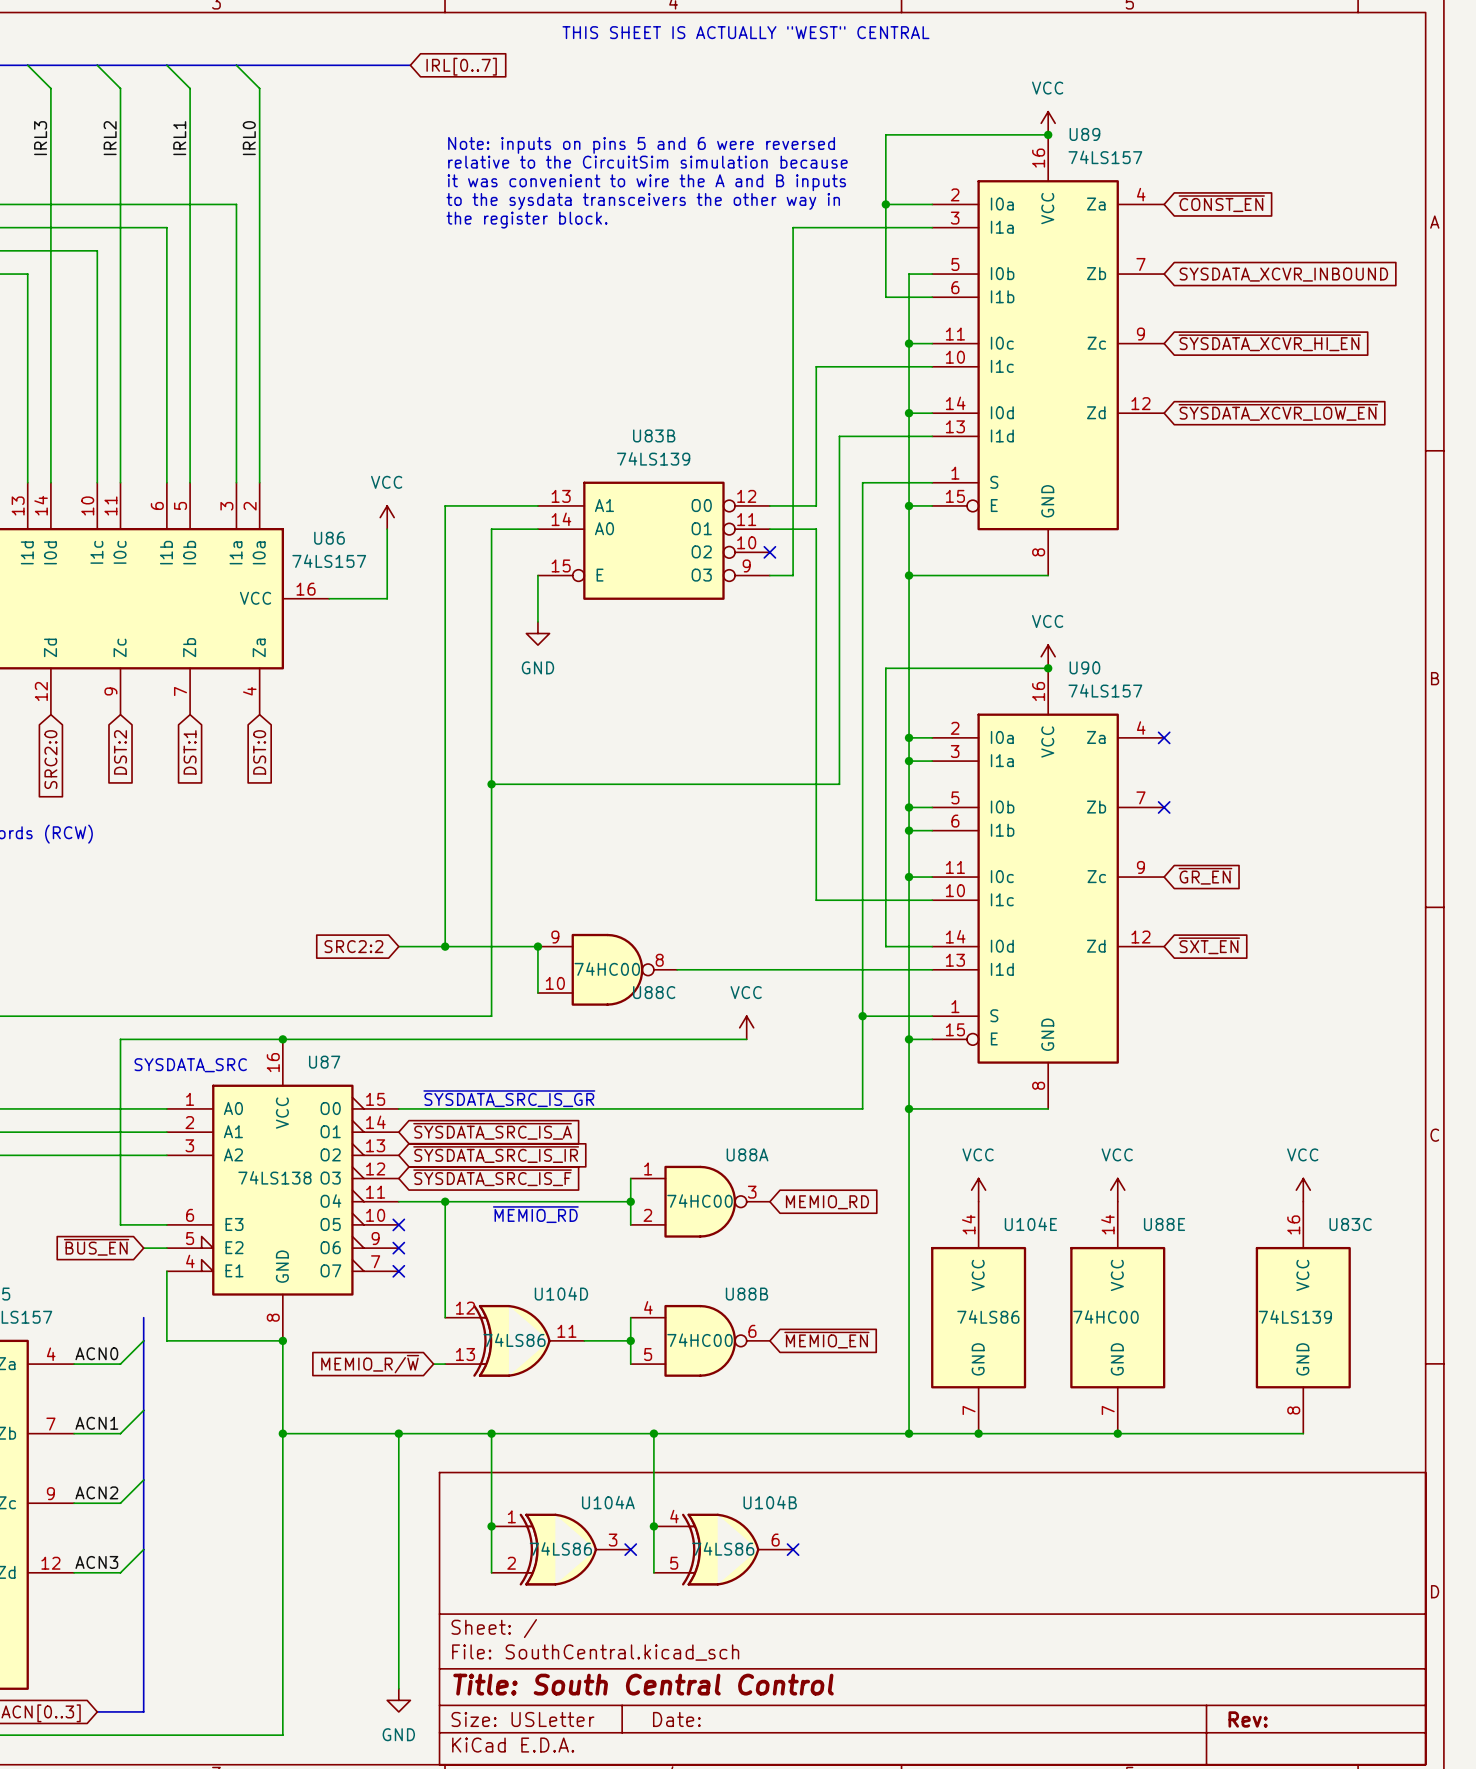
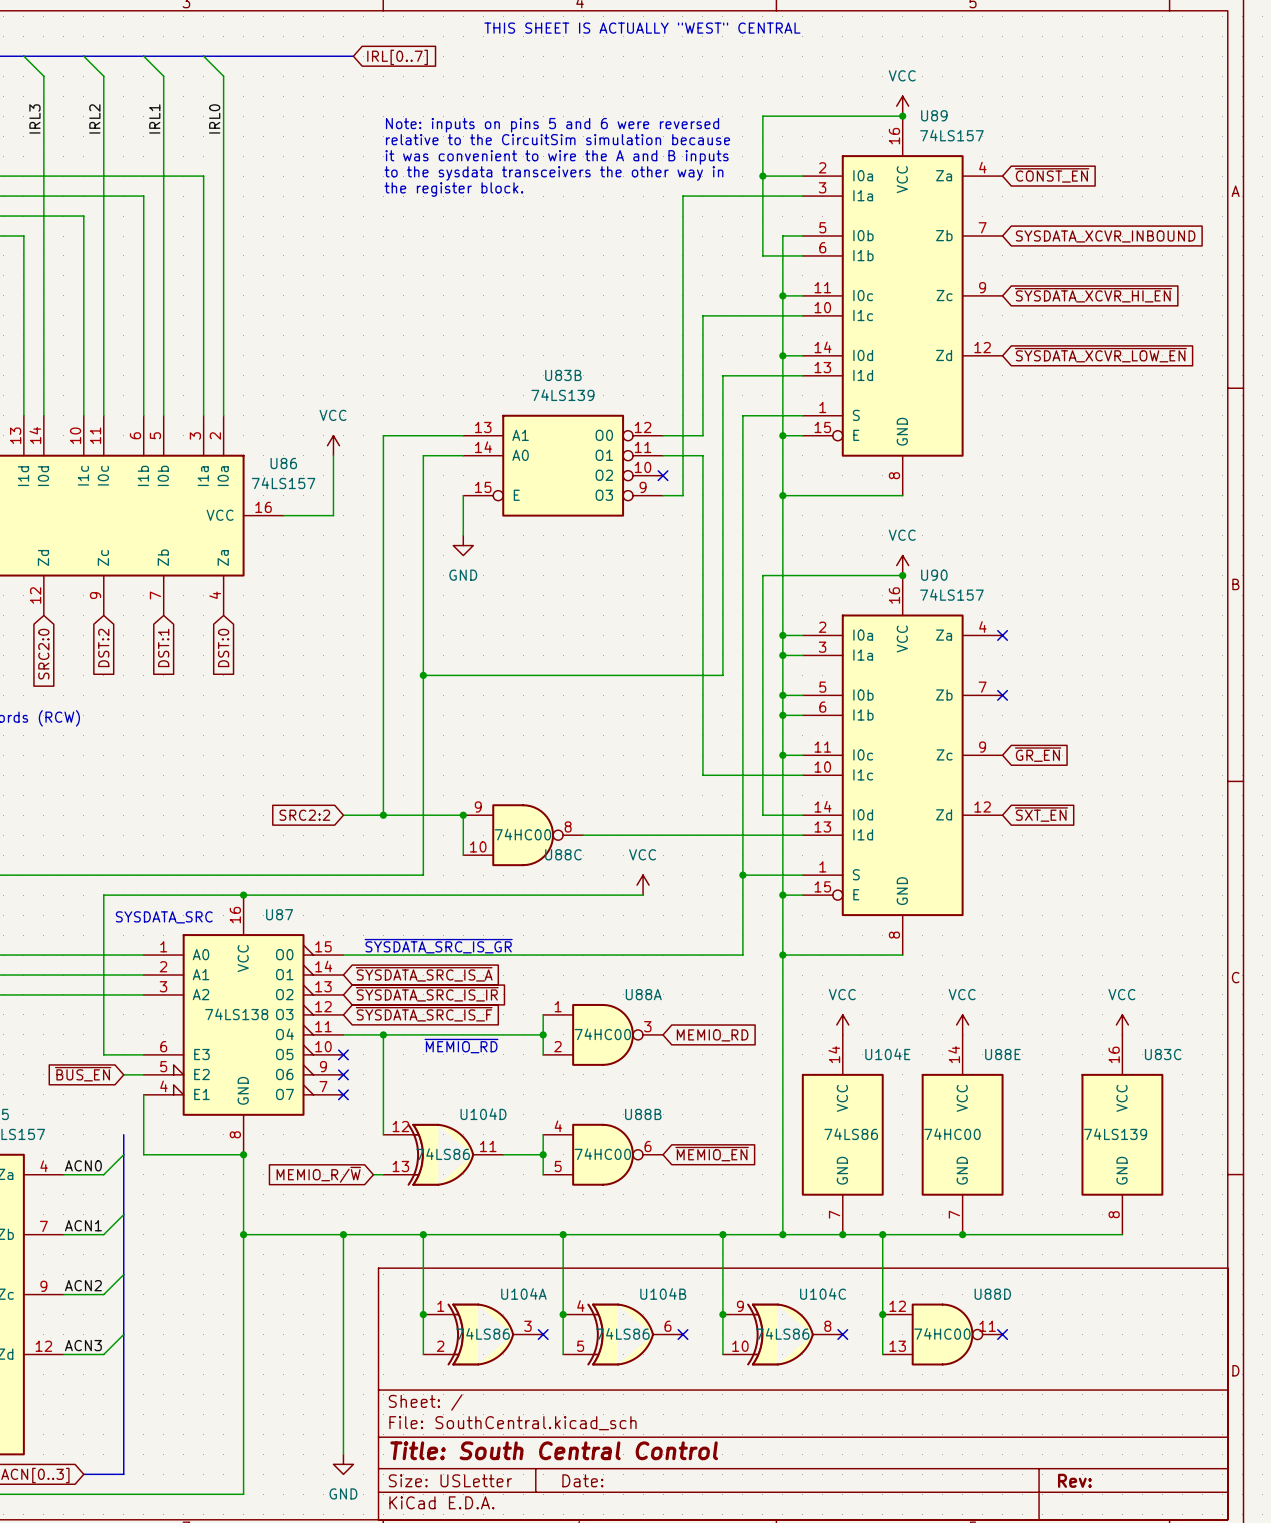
wire: none -> (722, 1234) (722, 1354)
junction: none -> (722, 1234)
wire: none -> (882, 1234) (882, 1354)
junction: none -> (882, 1234)
junction: none -> (722, 1314)
junction: none -> (882, 1314)
U104C: none -> 74LS86 (782, 1334)
no-connect mark: none -> (842, 1334)
U88D: none -> 74HC00 (942, 1334)
no-connect mark: none -> (1002, 1334)

